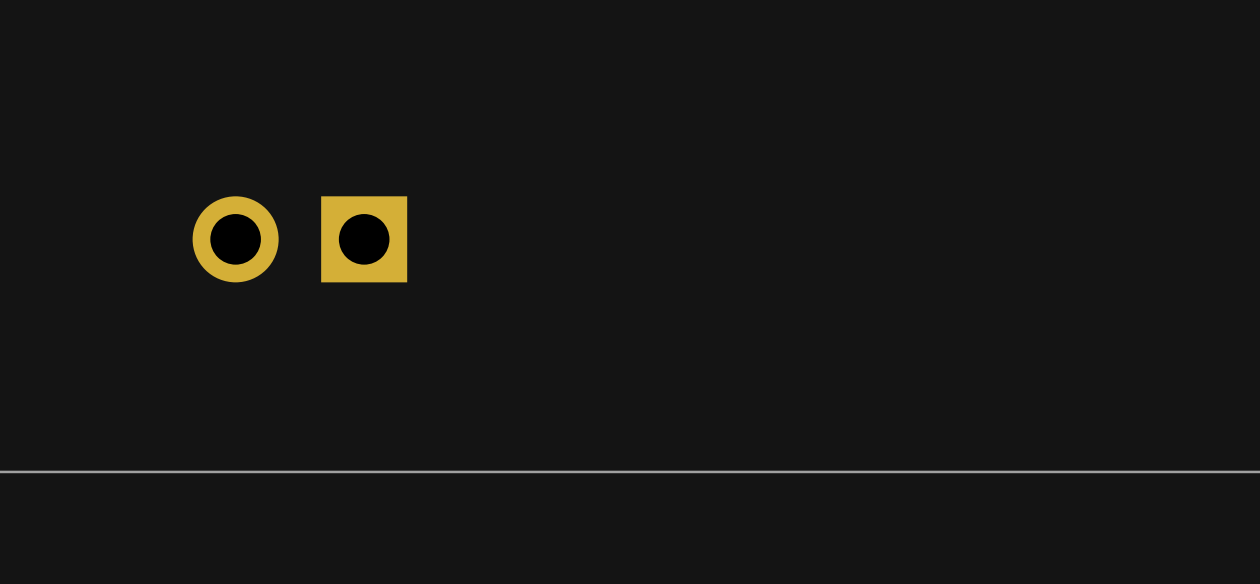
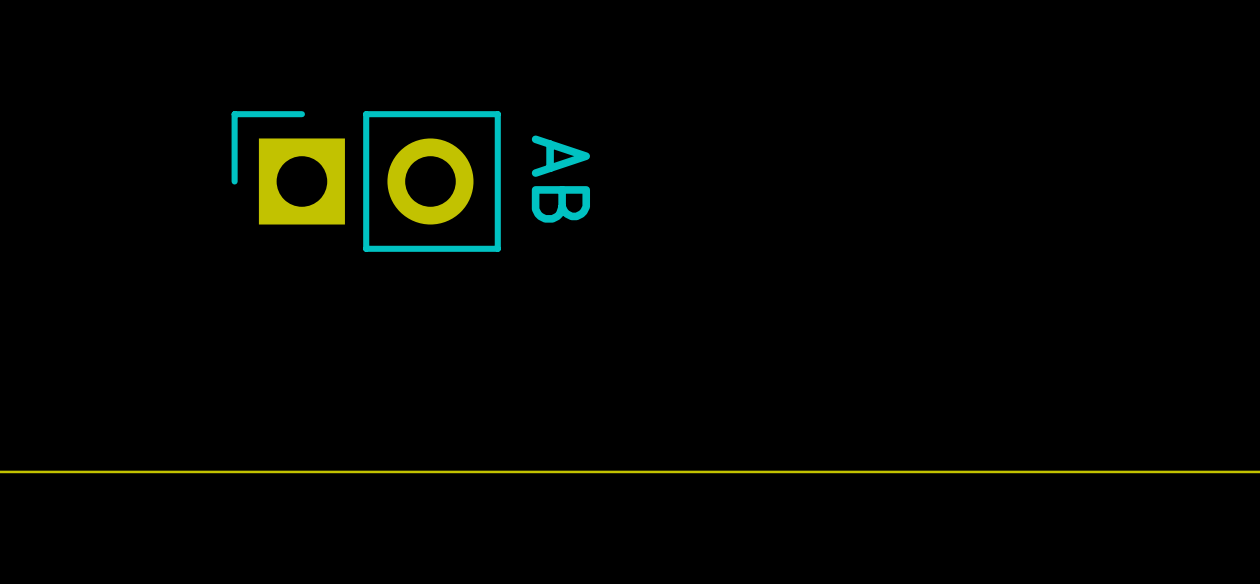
part side: top (299, 239) -> bottom (366, 181)

